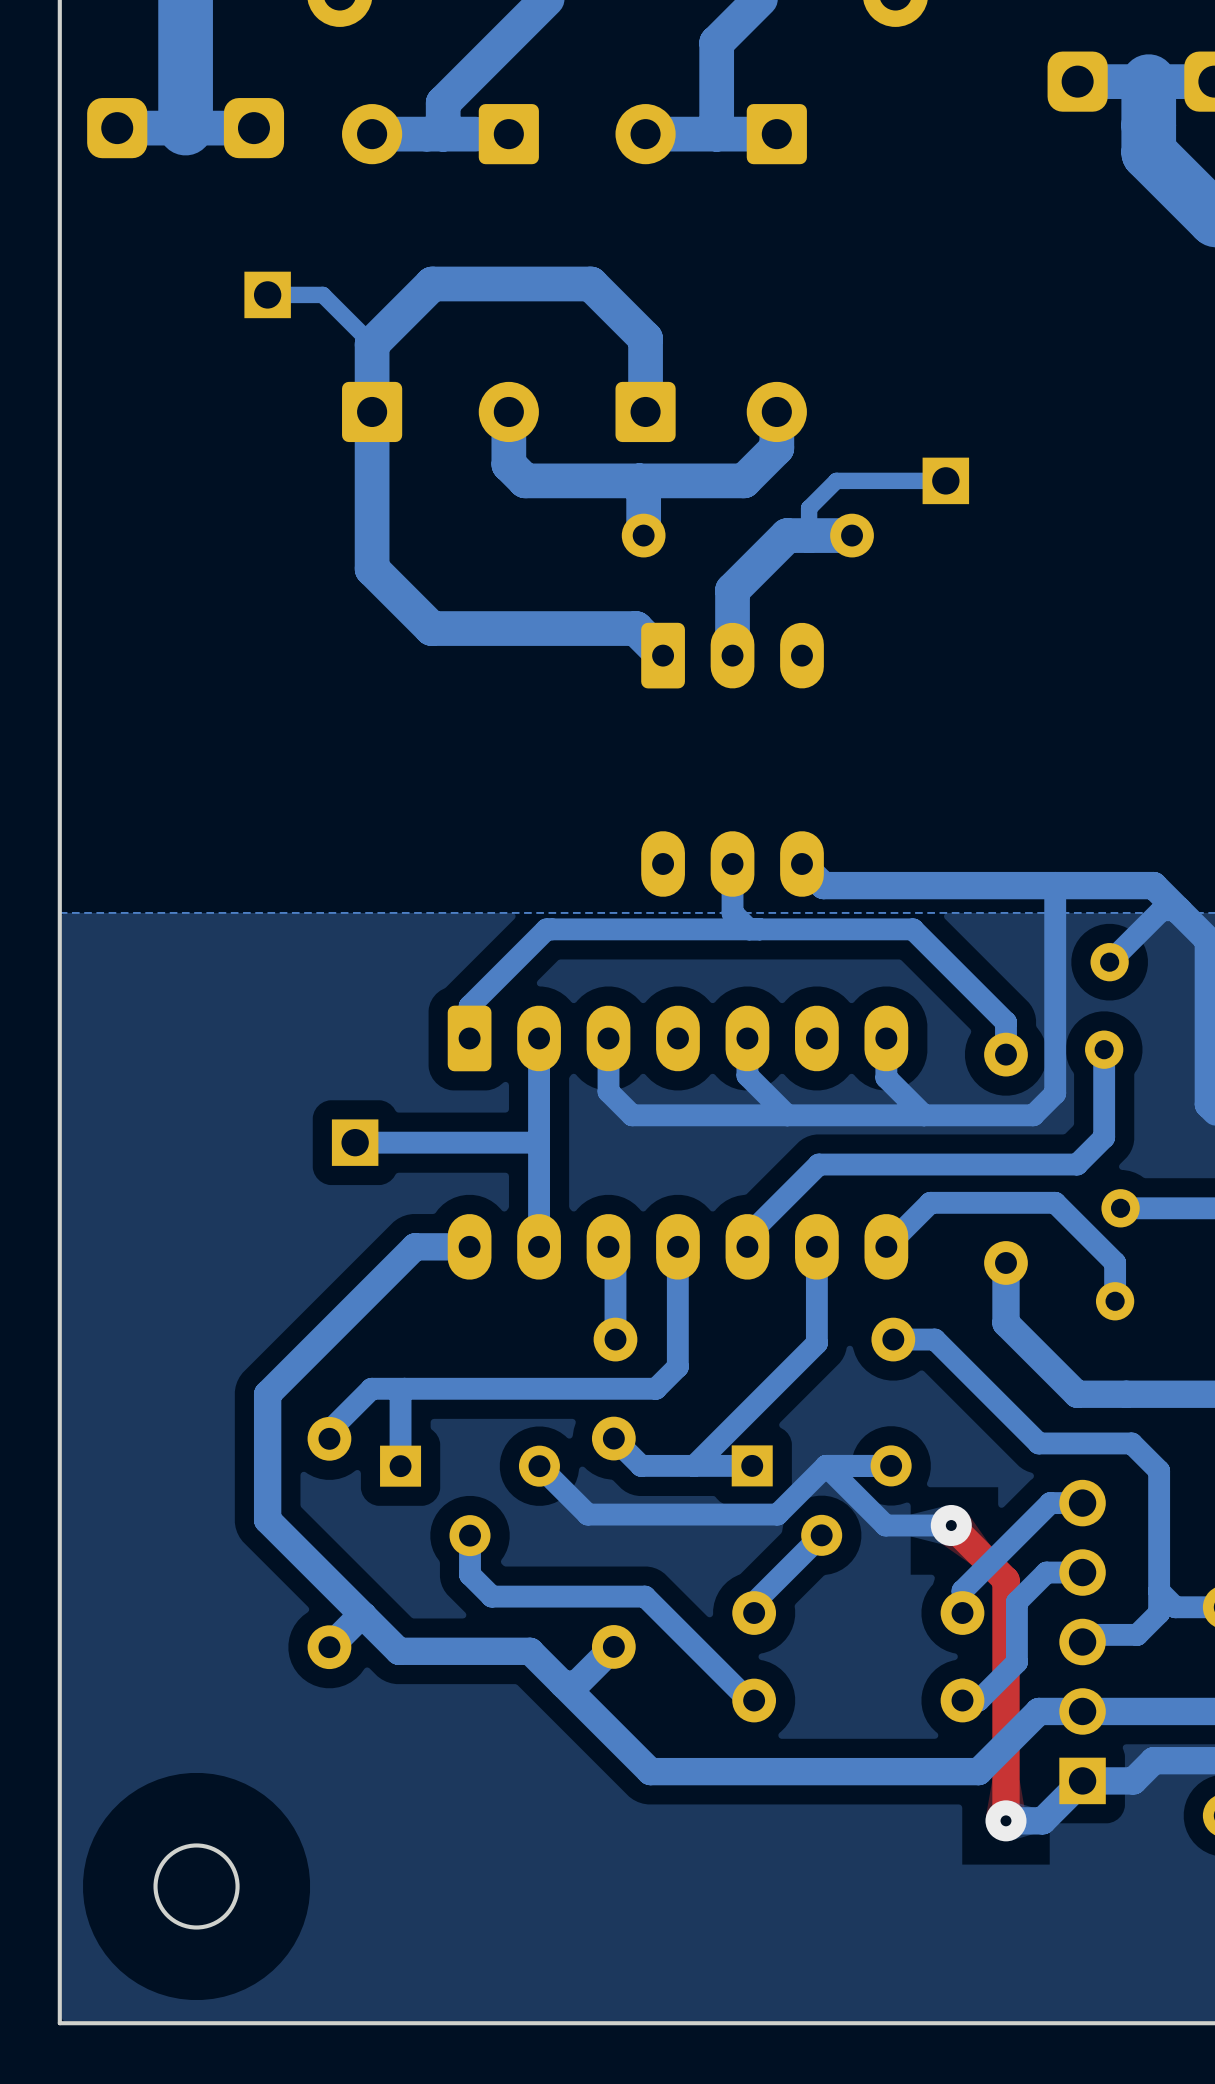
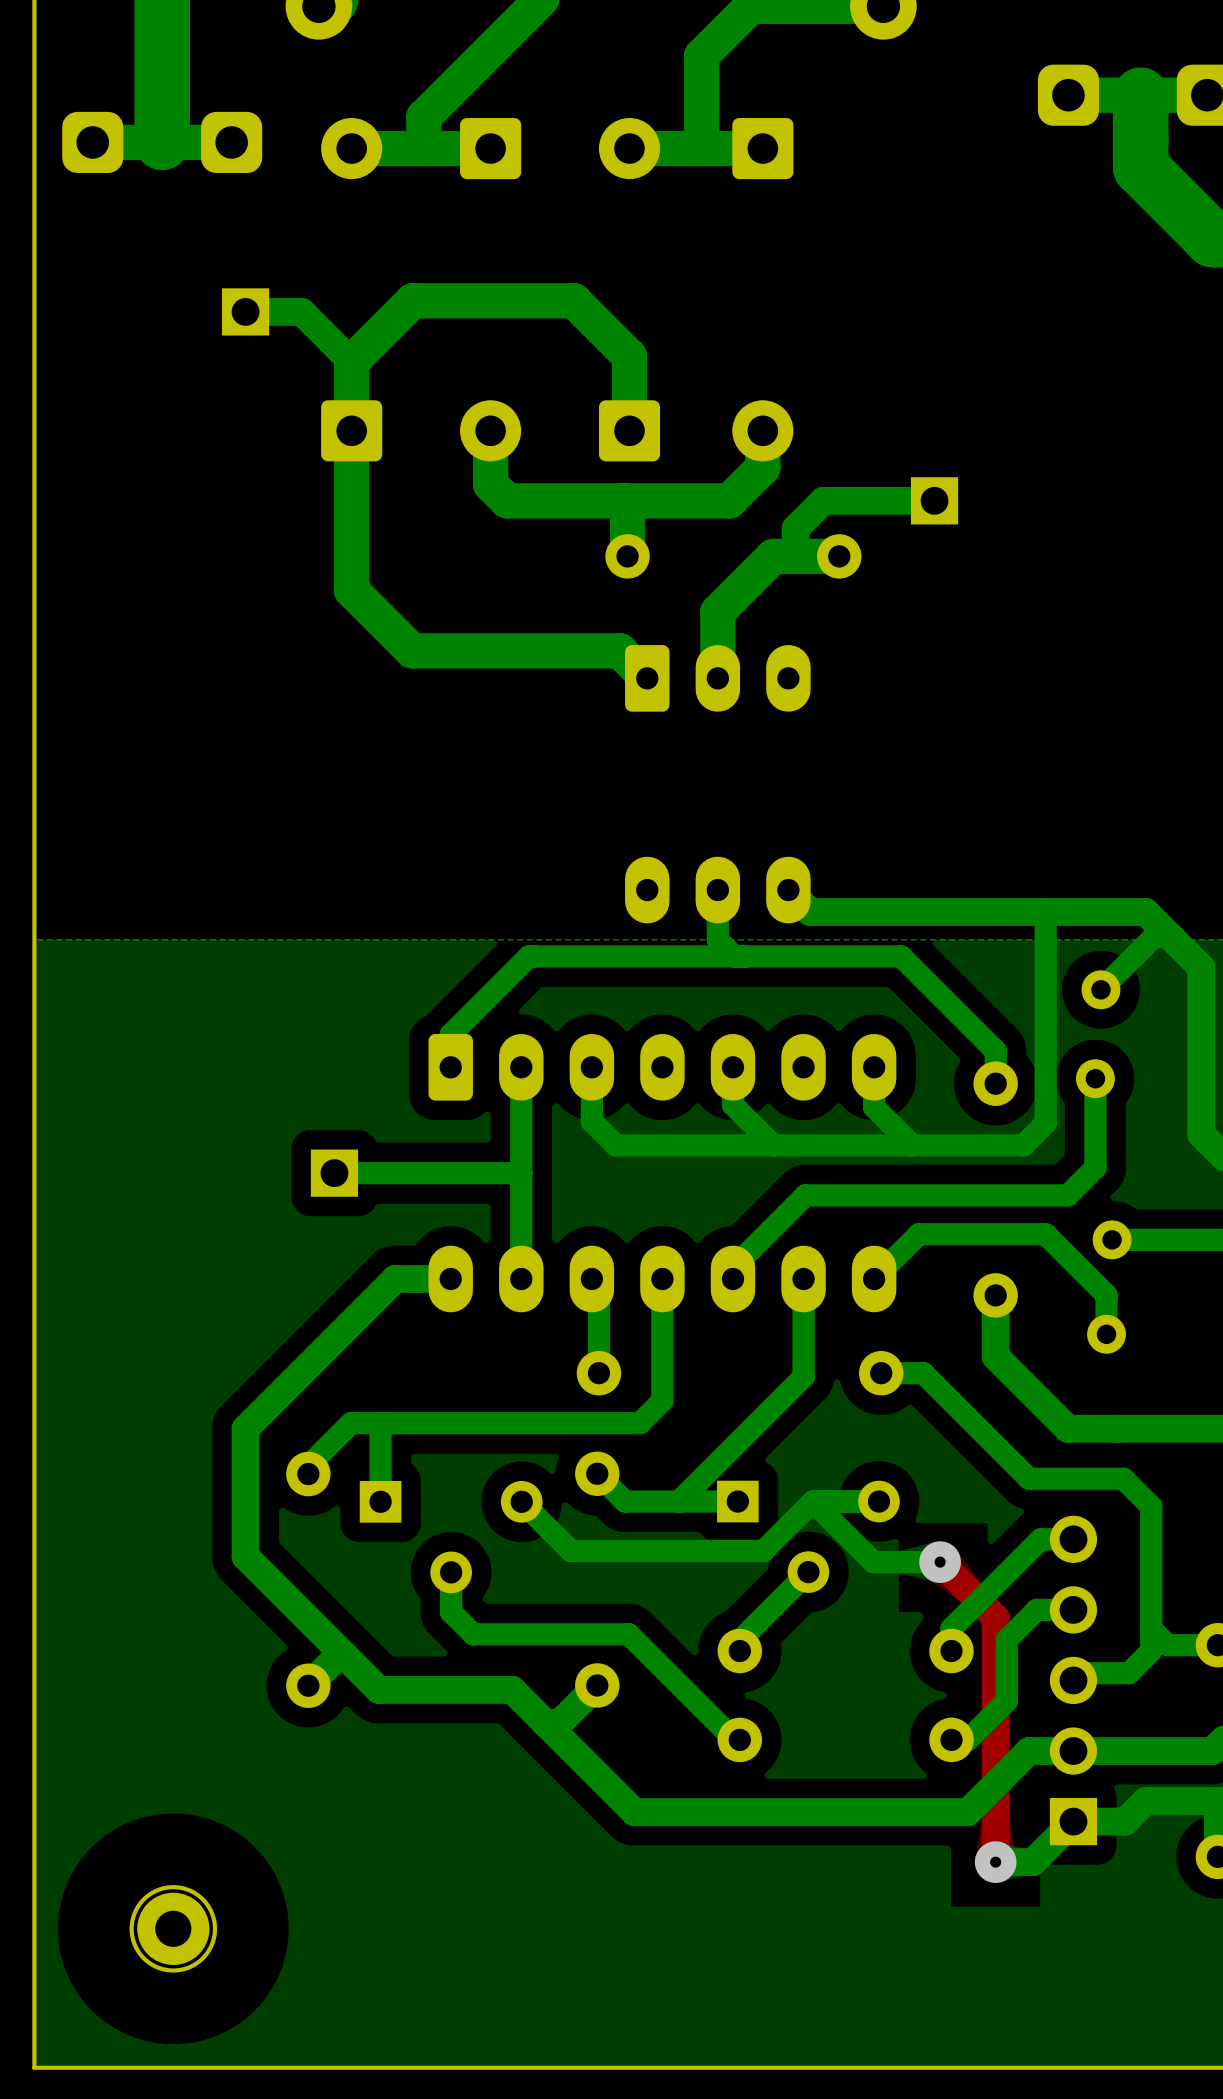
bottom track width: thin (267, 294) (322, 294) (372, 344) -> thick (245, 311) (301, 311) (351, 361)
bottom track width: thin (945, 480) (836, 480) (809, 508) (809, 535) -> thick (934, 500) (823, 500) (795, 528) (795, 556)
part: none -> (173, 1928)

